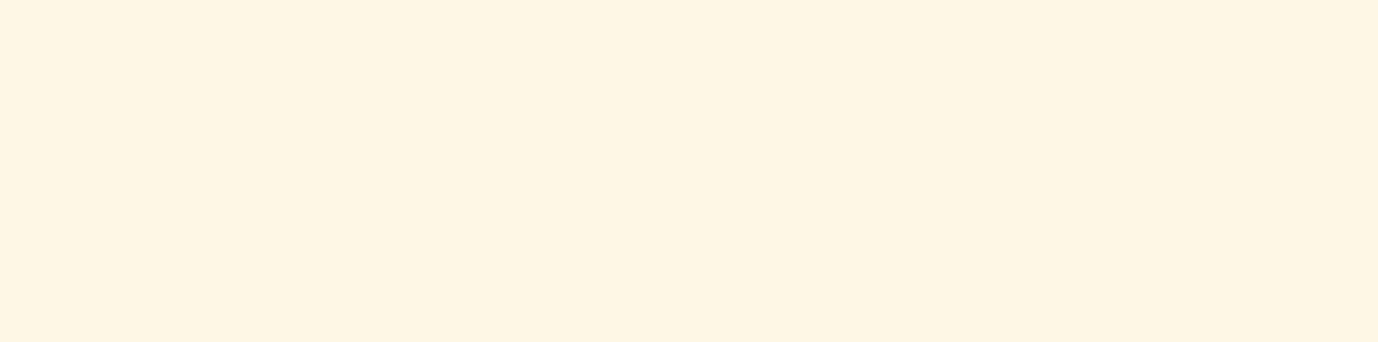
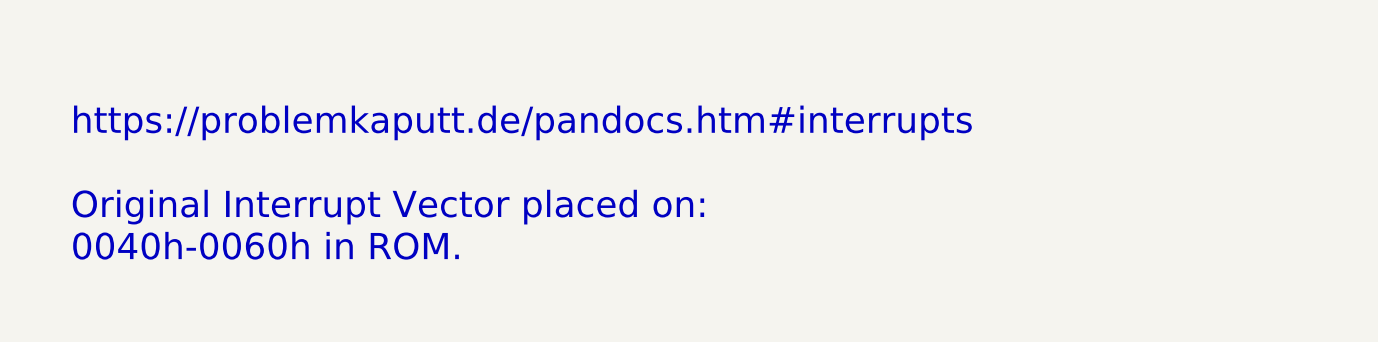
text: none -> https://problemkaputt.de/pandocs.htm#interrupts (522, 122)
text: none -> Original Interrupt Vector placed on: (388, 207)
text: none -> 0040h-0060h in ROM. (266, 245)

